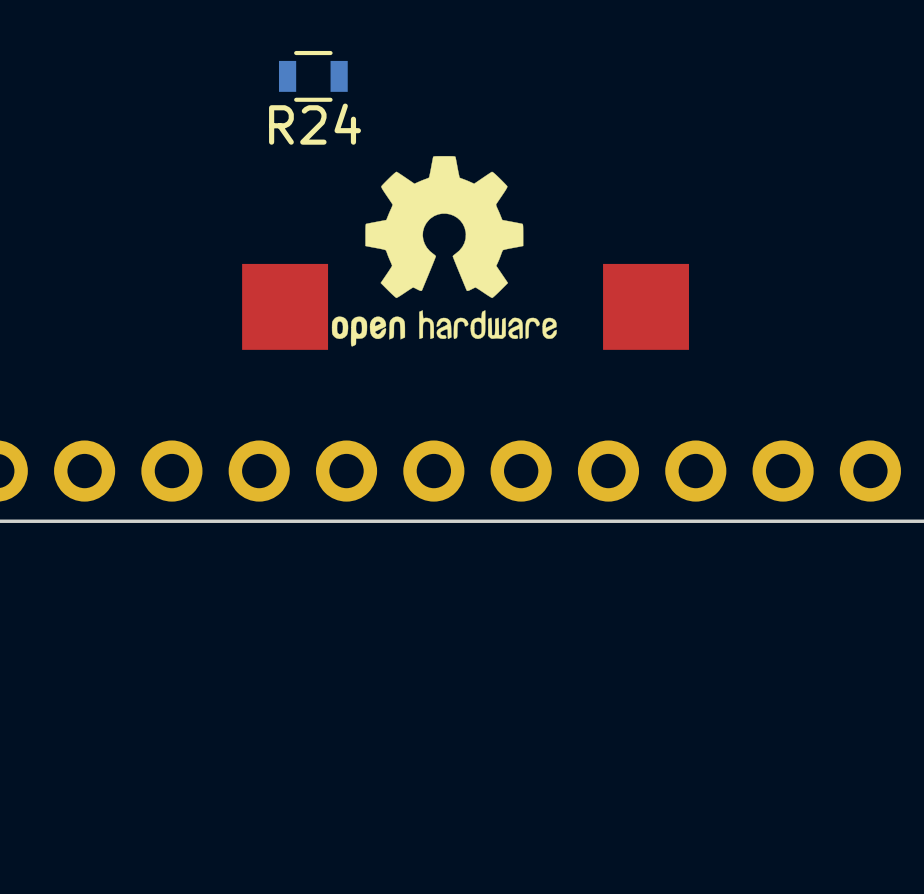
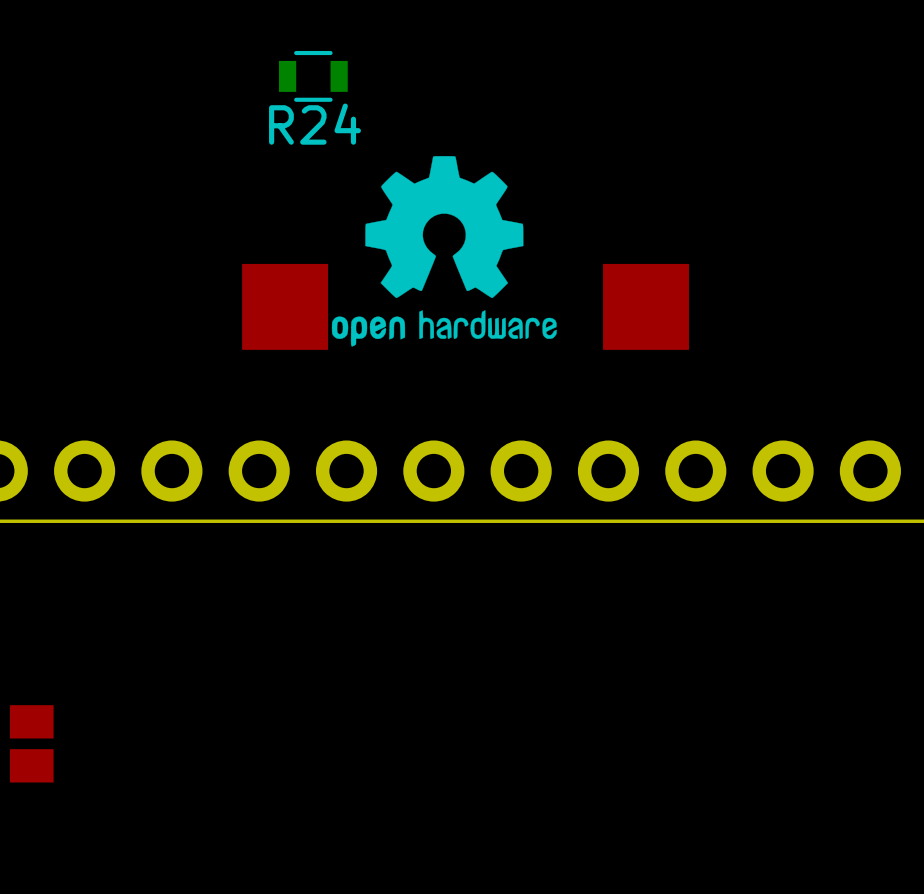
part: none -> (31, 743)

